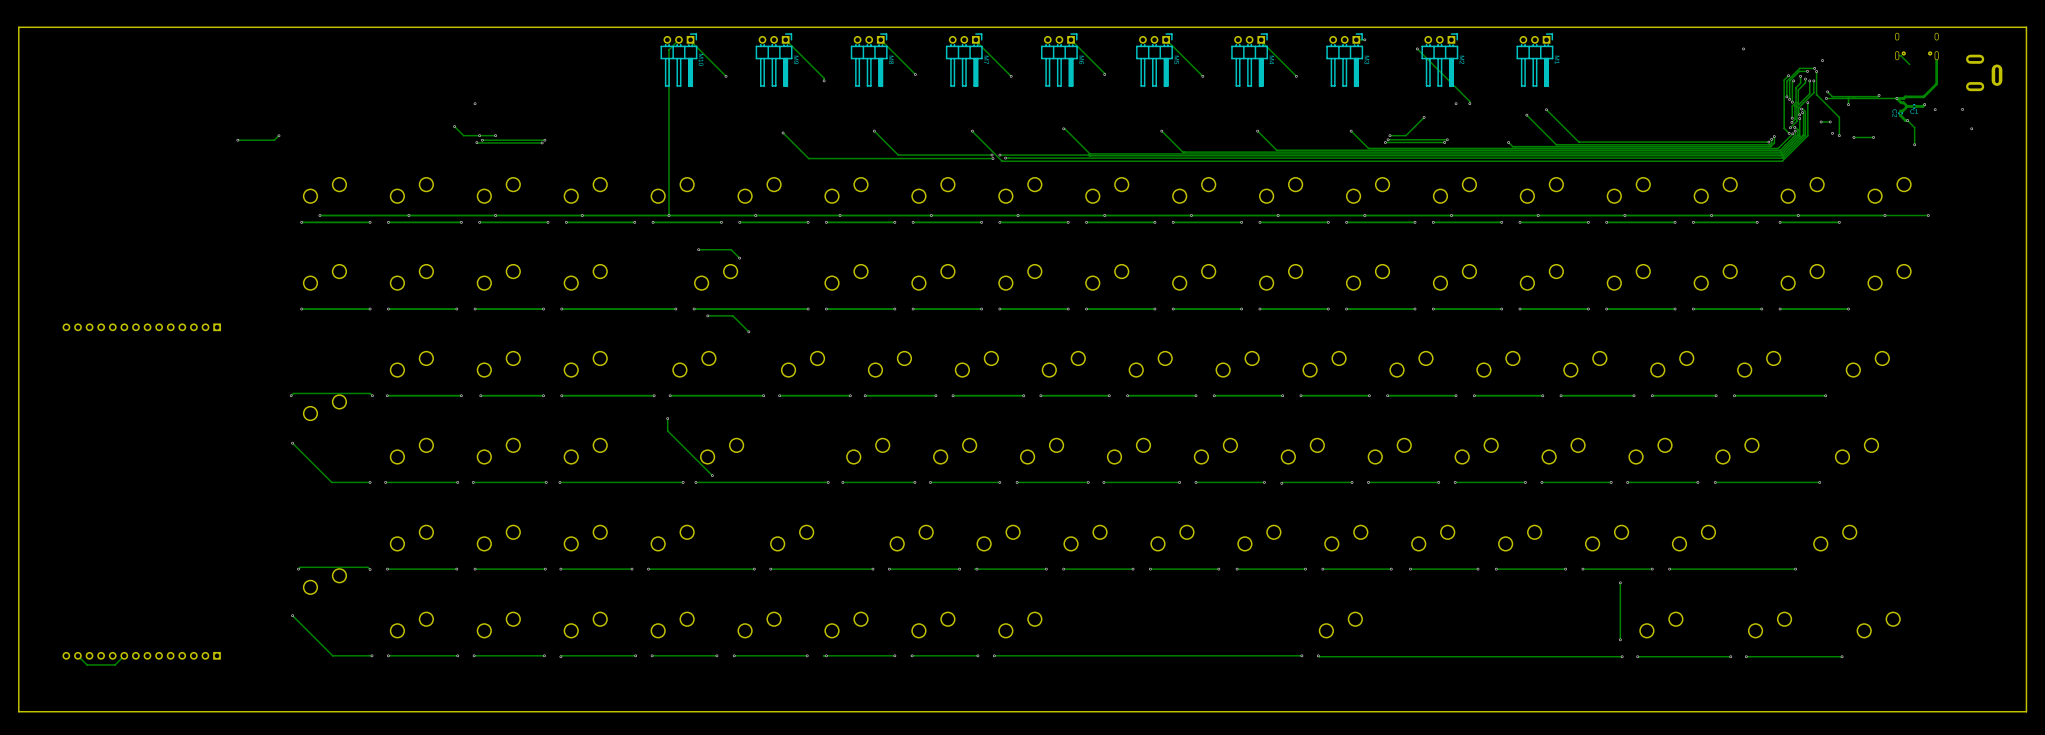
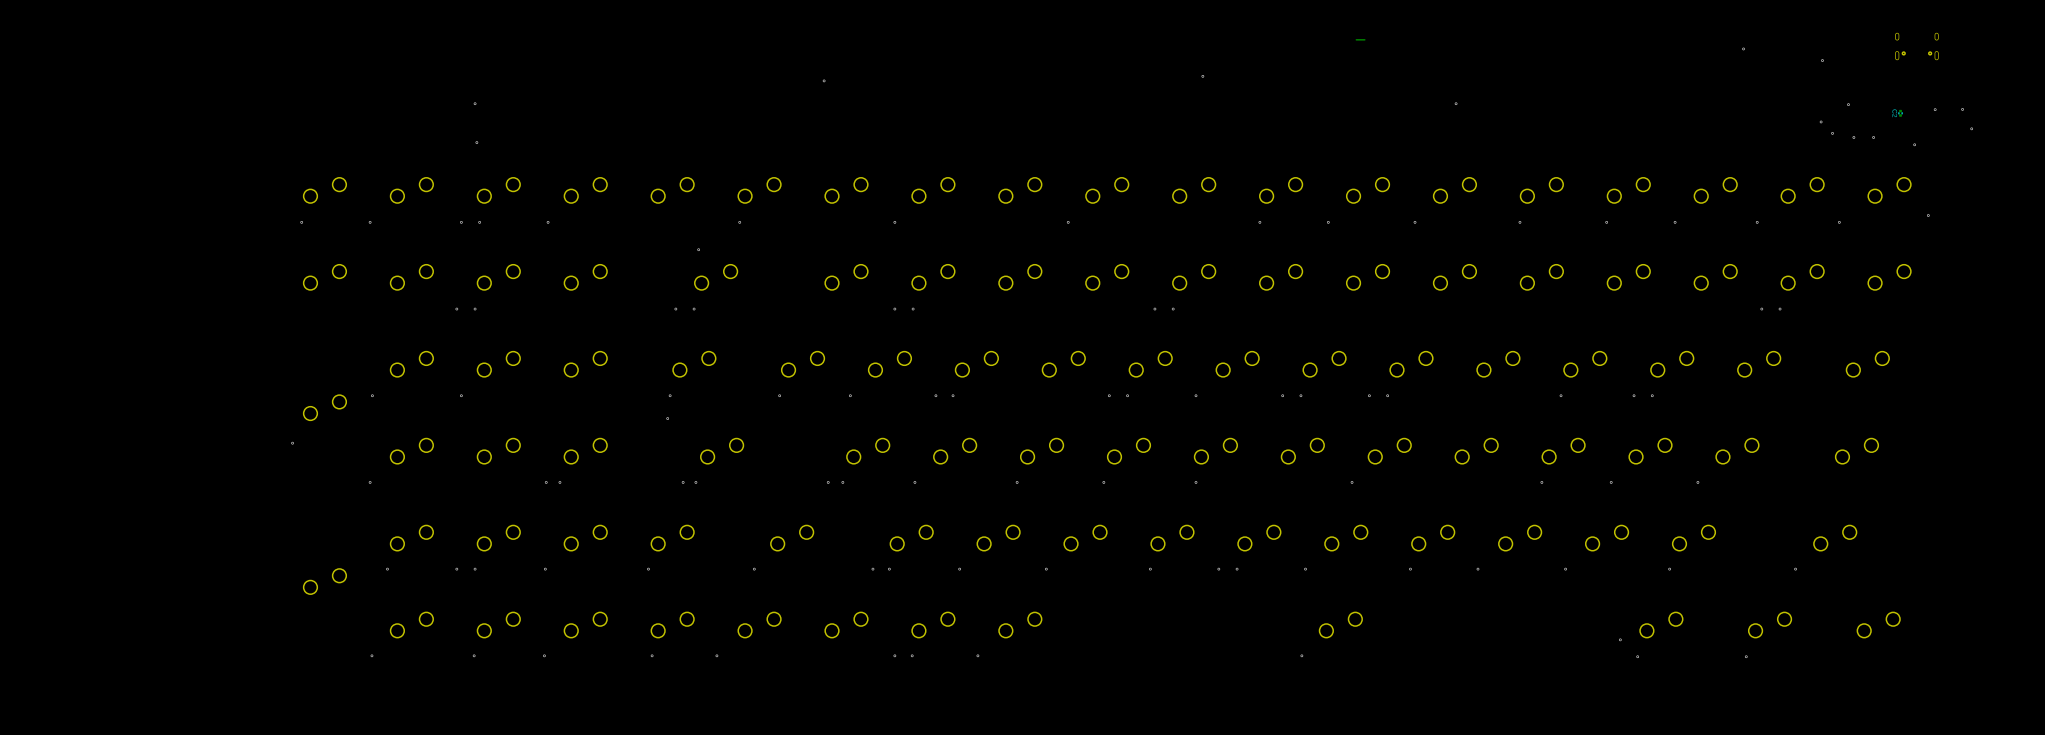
board edge: (2026, 27) (18, 27) (18, 711) (2026, 711) (2026, 27) -> none
track: (678, 39) (669, 49) (669, 215) -> none
track: (690, 39) (726, 76) -> none
track: (880, 39) (915, 74) -> none
track: (975, 39) (1011, 76) -> none
track: (1070, 39) (1104, 74) -> none
track: (1166, 39) (1202, 76) -> none
track: (1261, 39) (1296, 76) -> none
via: (1364, 39) -> none
track: (785, 41) (785, 39) (824, 78) (824, 80) -> none
track: (1417, 48) (1469, 101) (1469, 103) -> none
via: (1417, 48) -> none
track: (1897, 55) (1900, 55) (1909, 64) -> none
track: (1936, 55) (1936, 83) (1923, 96) (1896, 98) -> none
part: (678, 59) -> none
part: (774, 59) -> none
part: (869, 59) -> none
part: (964, 59) -> none
part: (1059, 59) -> none
part: (1154, 59) -> none
part: (1249, 59) -> none
part: (1344, 59) -> none
part: (1439, 59) -> none
part: (1534, 59) -> none
track: (1814, 68) (1799, 68) (1786, 81) (1786, 96) -> none
via: (1814, 68) -> none
track: (1807, 71) (1799, 71) (1789, 81) (1789, 99) -> none
via: (1807, 71) -> none
track: (1816, 71) (1816, 94) (1839, 117) (1839, 135) -> none
via: (1816, 71) -> none
part: (1984, 72) -> none
via: (915, 74) -> none
via: (1104, 74) -> none
track: (1788, 75) (1784, 80) (1784, 128) (1789, 133) -> none
via: (1788, 75) -> none
via: (726, 76) -> none
via: (1011, 76) -> none
via: (1296, 76) -> none
track: (1800, 76) (1800, 83) (1796, 87) (1796, 102) (1792, 106) (1792, 118) -> none
via: (1800, 76) -> none
track: (1805, 79) (1805, 82) (1798, 90) (1798, 102) (1794, 105) (1794, 119) (1791, 122) -> none
via: (1805, 79) -> none
track: (1793, 80) (1792, 102) -> none
via: (1793, 80) -> none
track: (1809, 80) (1809, 93) (1796, 106) (1796, 121) (1790, 127) -> none
via: (1809, 80) -> none
track: (1813, 80) (1813, 92) (1798, 107) (1799, 114) -> none
via: (1813, 80) -> none
track: (1827, 91) (1832, 96) (1879, 95) -> none
via: (1827, 91) -> none
via: (1879, 95) -> none
via: (1786, 96) -> none
via: (1826, 98) -> none
track: (1848, 98) (1848, 104) -> none
track: (1896, 98) (1826, 98) -> none
track: (1896, 98) (1907, 106) -> none
via: (1896, 98) -> none
via: (1789, 99) -> none
via: (1792, 102) -> none
track: (1807, 102) (1807, 135) (1782, 161) (1002, 161) (972, 131) -> none
via: (1807, 102) -> none
via: (1469, 103) -> none
track: (1924, 104) (1916, 106) -> none
via: (1924, 104) -> none
track: (1907, 106) (1900, 111) -> none
track: (1912, 106) (1907, 106) -> none
part: (1914, 106) -> none
track: (1546, 109) (1578, 142) (1768, 142) -> none
via: (1546, 109) -> none
track: (1801, 109) (1805, 111) (1805, 135) (1782, 158) (1005, 158) -> none
via: (1801, 109) -> none
track: (1802, 112) (1803, 134) (1782, 155) (999, 155) -> none
via: (1802, 112) -> none
via: (1799, 114) -> none
track: (1526, 115) (1556, 144) (1770, 144) (1771, 139) -> none
via: (1526, 115) -> none
track: (1900, 115) (1914, 127) (1914, 144) -> none
track: (1424, 117) (1405, 135) (1389, 135) -> none
via: (1424, 117) -> none
via: (1792, 118) -> none
track: (1799, 118) (1799, 135) (1781, 153) (1089, 153) (1063, 128) -> none
via: (1799, 118) -> none
via: (1907, 120) -> none
track: (1830, 121) (1821, 121) -> none
via: (1830, 121) -> none
via: (1791, 122) -> none
track: (454, 126) (463, 135) (495, 135) -> none
via: (454, 126) -> none
via: (1790, 127) -> none
track: (1794, 127) (1797, 129) (1797, 135) (1780, 152) (1182, 152) (1161, 131) -> none
via: (1794, 127) -> none
via: (1063, 128) -> none
track: (874, 131) (898, 155) (992, 155) -> none
via: (874, 131) -> none
via: (972, 131) -> none
via: (1161, 131) -> none
via: (1257, 131) -> none
track: (1351, 131) (1368, 148) (1778, 148) (1792, 133) -> none
via: (1351, 131) -> none
track: (1795, 131) (1795, 134) (1780, 150) (1276, 150) (1257, 131) -> none
via: (1795, 131) -> none
track: (783, 132) (808, 158) (993, 158) -> none
via: (783, 132) -> none
via: (1789, 133) -> none
via: (1792, 133) -> none
track: (278, 135) (274, 140) (237, 140) -> none
via: (278, 135) -> none
via: (479, 135) -> none
via: (495, 135) -> none
via: (1389, 135) -> none
via: (1839, 135) -> none
track: (1774, 136) (1774, 143) (1770, 146) (1512, 146) (1508, 142) -> none
via: (1774, 136) -> none
track: (1873, 137) (1853, 137) -> none
via: (1388, 139) -> none
track: (1447, 139) (1388, 139) -> none
via: (1447, 139) -> none
via: (1771, 139) -> none
via: (237, 140) -> none
via: (482, 140) -> none
track: (544, 140) (482, 140) -> none
via: (544, 140) -> none
track: (476, 142) (542, 142) -> none
via: (542, 142) -> none
via: (1385, 142) -> none
track: (1444, 142) (1385, 142) -> none
via: (1444, 142) -> none
via: (1508, 142) -> none
via: (1768, 142) -> none
via: (992, 155) -> none
via: (999, 155) -> none
via: (993, 158) -> none
via: (1005, 158) -> none
via: (319, 215) -> none
via: (408, 215) -> none
via: (495, 215) -> none
via: (582, 215) -> none
via: (669, 215) -> none
via: (755, 215) -> none
via: (840, 215) -> none
via: (931, 215) -> none
via: (1018, 215) -> none
via: (1104, 215) -> none
via: (1191, 215) -> none
via: (1278, 215) -> none
via: (1364, 215) -> none
via: (1451, 215) -> none
via: (1538, 215) -> none
via: (1624, 215) -> none
via: (1711, 215) -> none
via: (1798, 215) -> none
via: (1884, 215) -> none
track: (1928, 215) (319, 215) -> none
track: (370, 222) (301, 222) -> none
via: (388, 222) -> none
track: (461, 222) (388, 222) -> none
track: (548, 222) (479, 222) -> none
via: (566, 222) -> none
track: (634, 222) (566, 222) -> none
via: (634, 222) -> none
via: (653, 222) -> none
track: (721, 222) (653, 222) -> none
via: (721, 222) -> none
track: (808, 222) (739, 222) -> none
via: (808, 222) -> none
via: (826, 222) -> none
track: (894, 222) (826, 222) -> none
via: (913, 222) -> none
track: (981, 222) (913, 222) -> none
via: (981, 222) -> none
via: (999, 222) -> none
track: (1068, 222) (999, 222) -> none
via: (1086, 222) -> none
track: (1154, 222) (1086, 222) -> none
via: (1154, 222) -> none
via: (1173, 222) -> none
track: (1241, 222) (1173, 222) -> none
via: (1241, 222) -> none
track: (1328, 222) (1259, 222) -> none
via: (1346, 222) -> none
track: (1415, 222) (1346, 222) -> none
via: (1433, 222) -> none
track: (1501, 222) (1433, 222) -> none
via: (1501, 222) -> none
track: (1588, 222) (1519, 222) -> none
via: (1588, 222) -> none
track: (1675, 222) (1606, 222) -> none
via: (1693, 222) -> none
track: (1757, 222) (1693, 222) -> none
via: (1780, 222) -> none
track: (1839, 222) (1780, 222) -> none
track: (698, 249) (731, 249) (739, 258) -> none
via: (739, 258) -> none
via: (301, 309) -> none
track: (370, 309) (301, 309) -> none
via: (370, 309) -> none
via: (388, 309) -> none
track: (456, 309) (388, 309) -> none
track: (543, 309) (475, 309) -> none
via: (543, 309) -> none
via: (561, 309) -> none
track: (675, 309) (561, 309) -> none
track: (808, 309) (694, 309) -> none
via: (808, 309) -> none
via: (826, 309) -> none
track: (894, 309) (826, 309) -> none
track: (981, 309) (913, 309) -> none
via: (981, 309) -> none
via: (999, 309) -> none
track: (1068, 309) (999, 309) -> none
via: (1068, 309) -> none
via: (1086, 309) -> none
track: (1154, 309) (1086, 309) -> none
track: (1241, 309) (1173, 309) -> none
via: (1241, 309) -> none
via: (1259, 309) -> none
track: (1328, 309) (1259, 309) -> none
via: (1328, 309) -> none
via: (1346, 309) -> none
track: (1415, 309) (1346, 309) -> none
via: (1415, 309) -> none
via: (1433, 309) -> none
track: (1501, 309) (1433, 309) -> none
via: (1501, 309) -> none
via: (1519, 309) -> none
track: (1588, 309) (1519, 309) -> none
via: (1588, 309) -> none
via: (1606, 309) -> none
track: (1675, 309) (1606, 309) -> none
via: (1675, 309) -> none
via: (1693, 309) -> none
track: (1761, 309) (1693, 309) -> none
track: (1848, 309) (1780, 309) -> none
via: (1848, 309) -> none
track: (707, 315) (732, 315) (748, 331) -> none
via: (707, 315) -> none
part: (141, 327) -> none
via: (748, 331) -> none
via: (291, 395) -> none
track: (372, 395) (370, 393) (293, 393) (291, 395) -> none
via: (387, 395) -> none
track: (461, 395) (387, 395) -> none
via: (480, 395) -> none
track: (543, 395) (480, 395) -> none
via: (543, 395) -> none
via: (561, 395) -> none
track: (654, 395) (561, 395) -> none
via: (654, 395) -> none
track: (763, 395) (670, 395) -> none
via: (763, 395) -> none
track: (850, 395) (779, 395) -> none
via: (865, 395) -> none
track: (935, 395) (865, 395) -> none
track: (1023, 395) (953, 395) -> none
via: (1023, 395) -> none
via: (1040, 395) -> none
track: (1109, 395) (1040, 395) -> none
track: (1196, 395) (1127, 395) -> none
via: (1214, 395) -> none
track: (1282, 395) (1214, 395) -> none
track: (1369, 395) (1300, 395) -> none
track: (1456, 395) (1387, 395) -> none
via: (1456, 395) -> none
via: (1474, 395) -> none
track: (1542, 395) (1474, 395) -> none
via: (1542, 395) -> none
track: (1634, 395) (1561, 395) -> none
track: (1716, 395) (1652, 395) -> none
via: (1716, 395) -> none
via: (1734, 395) -> none
track: (1825, 395) (1734, 395) -> none
via: (1825, 395) -> none
track: (667, 418) (667, 430) (712, 475) -> none
track: (292, 443) (331, 482) (370, 482) -> none
via: (712, 475) -> none
via: (385, 482) -> none
track: (457, 482) (385, 482) -> none
via: (457, 482) -> none
via: (473, 482) -> none
track: (546, 482) (473, 482) -> none
track: (683, 482) (559, 482) -> none
track: (828, 482) (695, 482) -> none
track: (914, 482) (842, 482) -> none
via: (930, 482) -> none
track: (999, 482) (930, 482) -> none
via: (999, 482) -> none
track: (1088, 482) (1017, 482) -> none
via: (1088, 482) -> none
track: (1179, 482) (1103, 482) -> none
via: (1179, 482) -> none
track: (1264, 482) (1196, 482) -> none
via: (1264, 482) -> none
track: (1352, 482) (1281, 483) -> none
via: (1368, 482) -> none
track: (1438, 482) (1368, 482) -> none
via: (1438, 482) -> none
via: (1455, 482) -> none
track: (1525, 482) (1455, 482) -> none
via: (1525, 482) -> none
track: (1611, 482) (1541, 482) -> none
via: (1627, 482) -> none
track: (1697, 482) (1627, 482) -> none
via: (1715, 482) -> none
track: (1819, 482) (1715, 482) -> none
via: (1819, 482) -> none
via: (1281, 483) -> none
track: (298, 569) (300, 567) (367, 567) (370, 569) -> none
via: (298, 569) -> none
via: (370, 569) -> none
track: (456, 569) (387, 569) -> none
track: (545, 569) (475, 569) -> none
via: (560, 569) -> none
track: (632, 569) (560, 569) -> none
via: (632, 569) -> none
track: (754, 569) (648, 569) -> none
via: (770, 569) -> none
track: (872, 569) (770, 569) -> none
track: (959, 569) (889, 569) -> none
via: (976, 569) -> none
track: (1046, 569) (975, 569) -> none
via: (1063, 569) -> none
track: (1133, 569) (1063, 569) -> none
via: (1133, 569) -> none
track: (1218, 569) (1150, 569) -> none
track: (1305, 569) (1237, 569) -> none
via: (1322, 569) -> none
track: (1391, 569) (1322, 569) -> none
via: (1391, 569) -> none
track: (1477, 569) (1410, 569) -> none
via: (1496, 569) -> none
track: (1565, 569) (1496, 569) -> none
via: (1582, 569) -> none
track: (1652, 569) (1582, 569) -> none
via: (1652, 569) -> none
track: (1795, 569) (1669, 569) -> none
track: (1620, 582) (1620, 639) -> none
via: (1620, 582) -> none
track: (292, 615) (332, 655) (371, 655) -> none
via: (292, 615) -> none
track: (124, 655) (115, 664) (87, 664) (77, 655) -> none
part: (141, 655) -> none
via: (388, 655) -> none
track: (457, 655) (388, 655) -> none
via: (457, 655) -> none
track: (544, 655) (474, 655) -> none
track: (635, 655) (560, 656) -> none
via: (635, 655) -> none
track: (716, 655) (652, 655) -> none
via: (734, 655) -> none
track: (807, 655) (734, 655) -> none
via: (807, 655) -> none
via: (826, 655) -> none
track: (894, 655) (823, 655) -> none
track: (977, 655) (911, 655) -> none
via: (994, 655) -> none
track: (1301, 655) (994, 655) -> none
track: (1318, 655) (1622, 656) -> none
via: (1318, 655) -> none
via: (560, 656) -> none
via: (1622, 656) -> none
track: (1730, 656) (1637, 656) -> none
via: (1730, 656) -> none
track: (1842, 656) (1746, 656) -> none
via: (1842, 656) -> none

